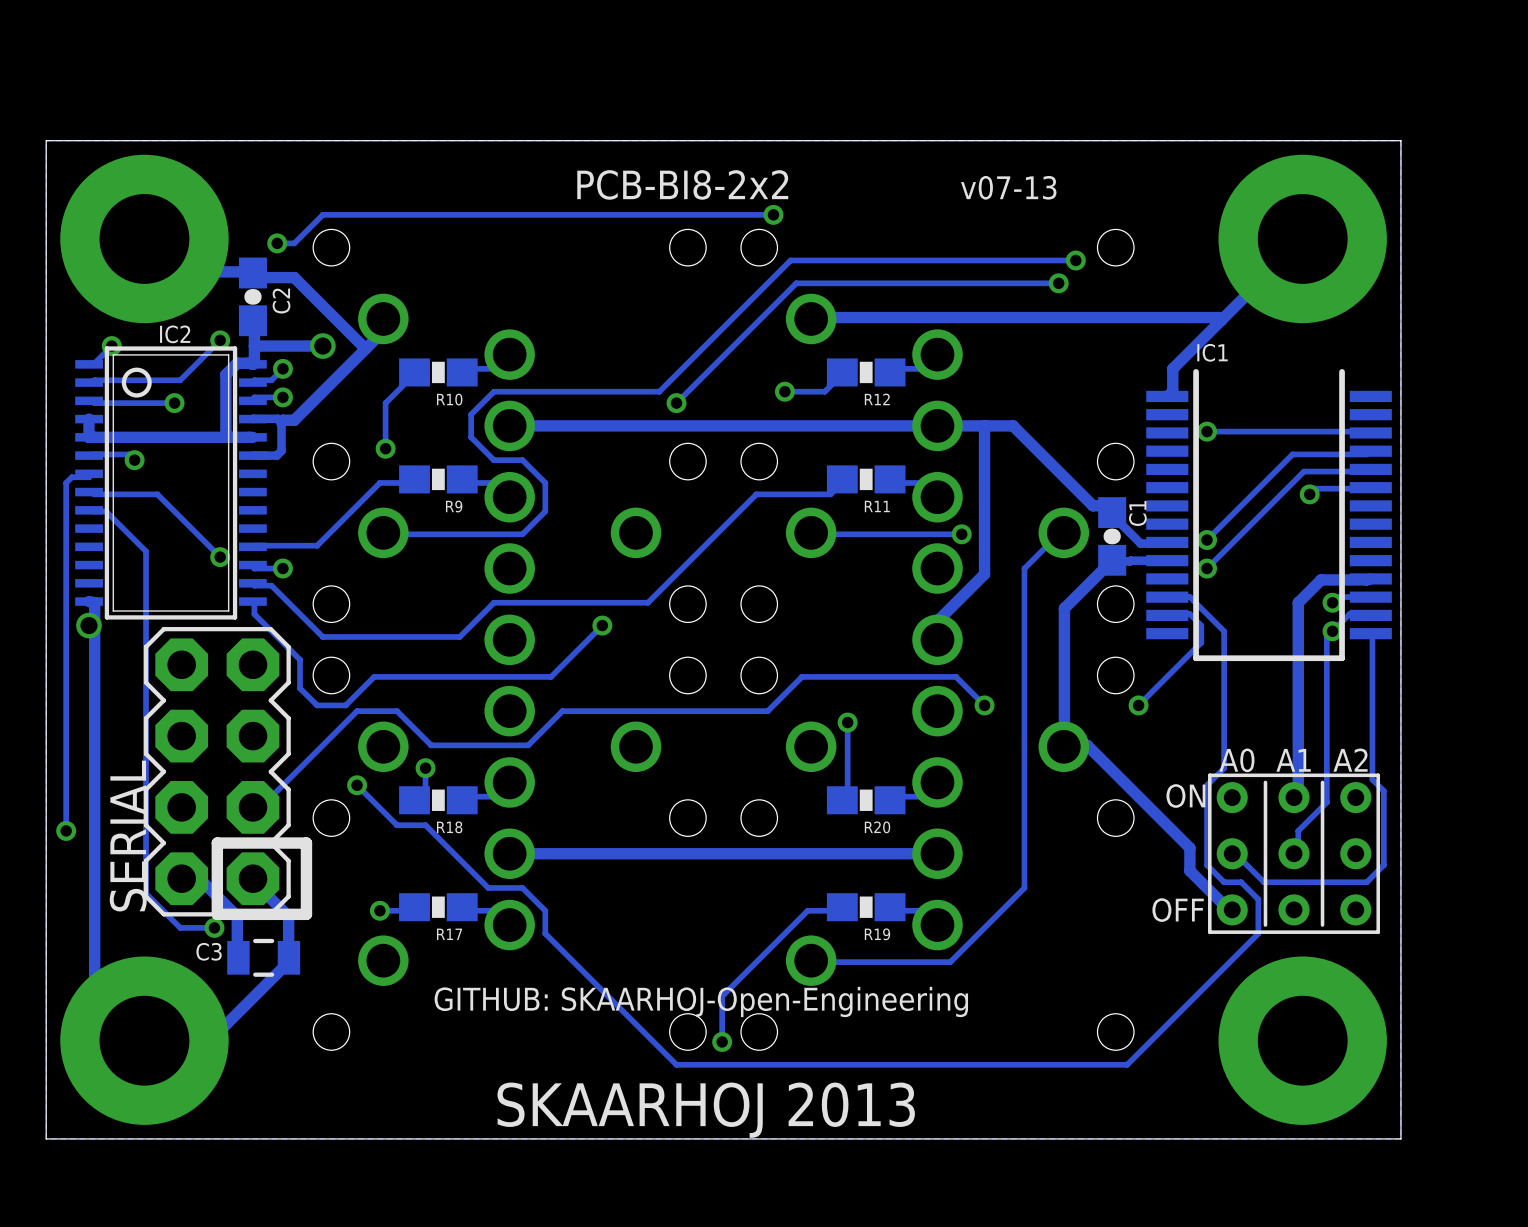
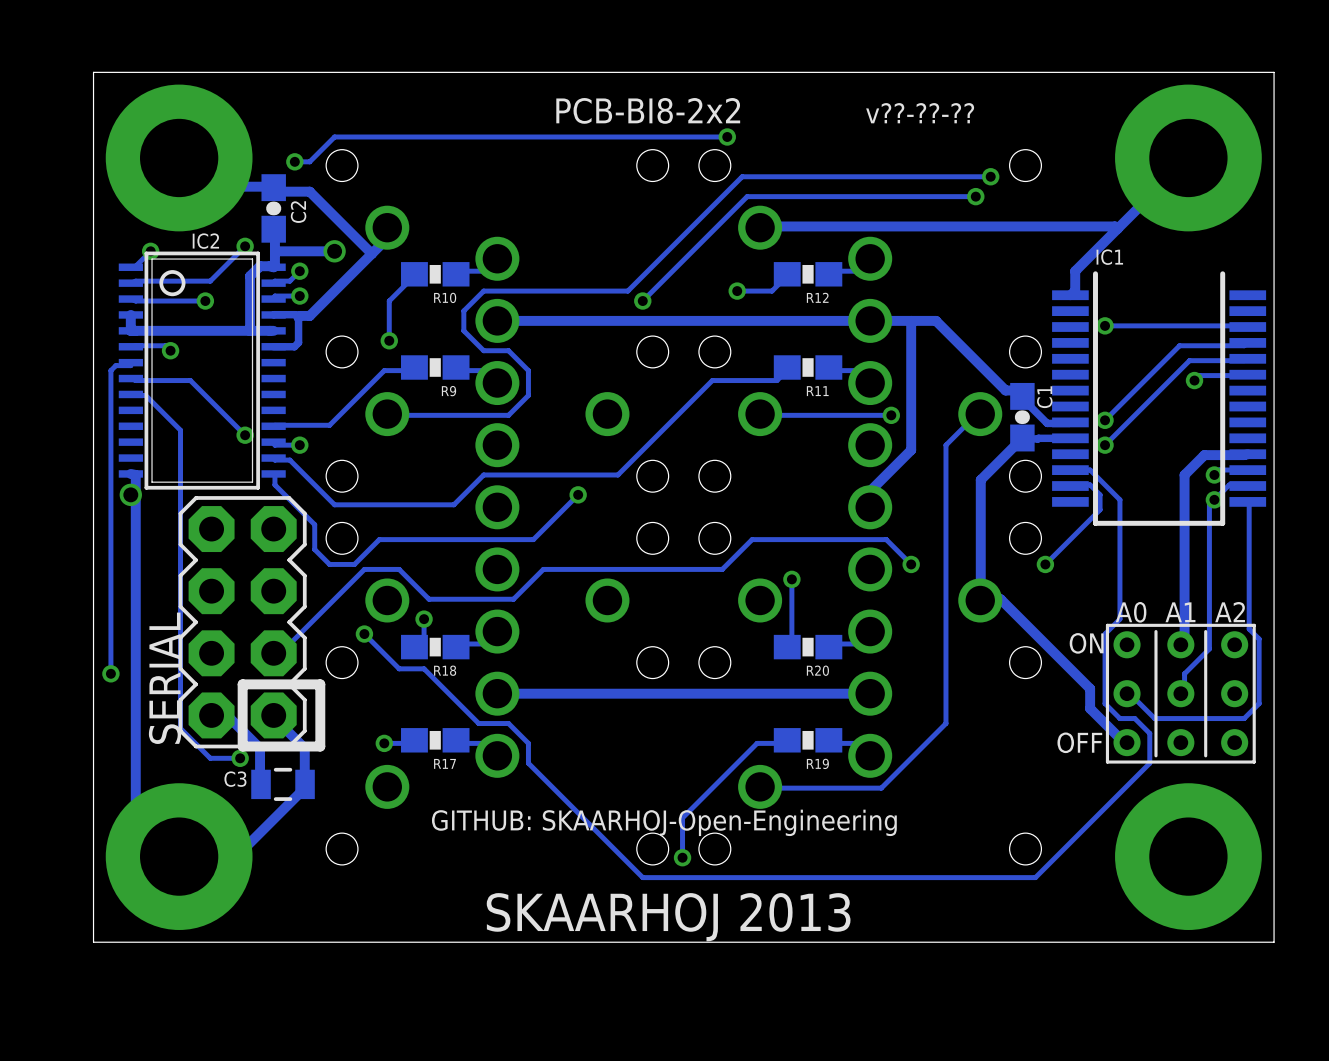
zone outline: (1400, 140) (46, 140) (46, 1138) (1400, 1138) (1400, 140) -> none
text: v07-13 (1008, 187) -> v??-??-?? (920, 113)

